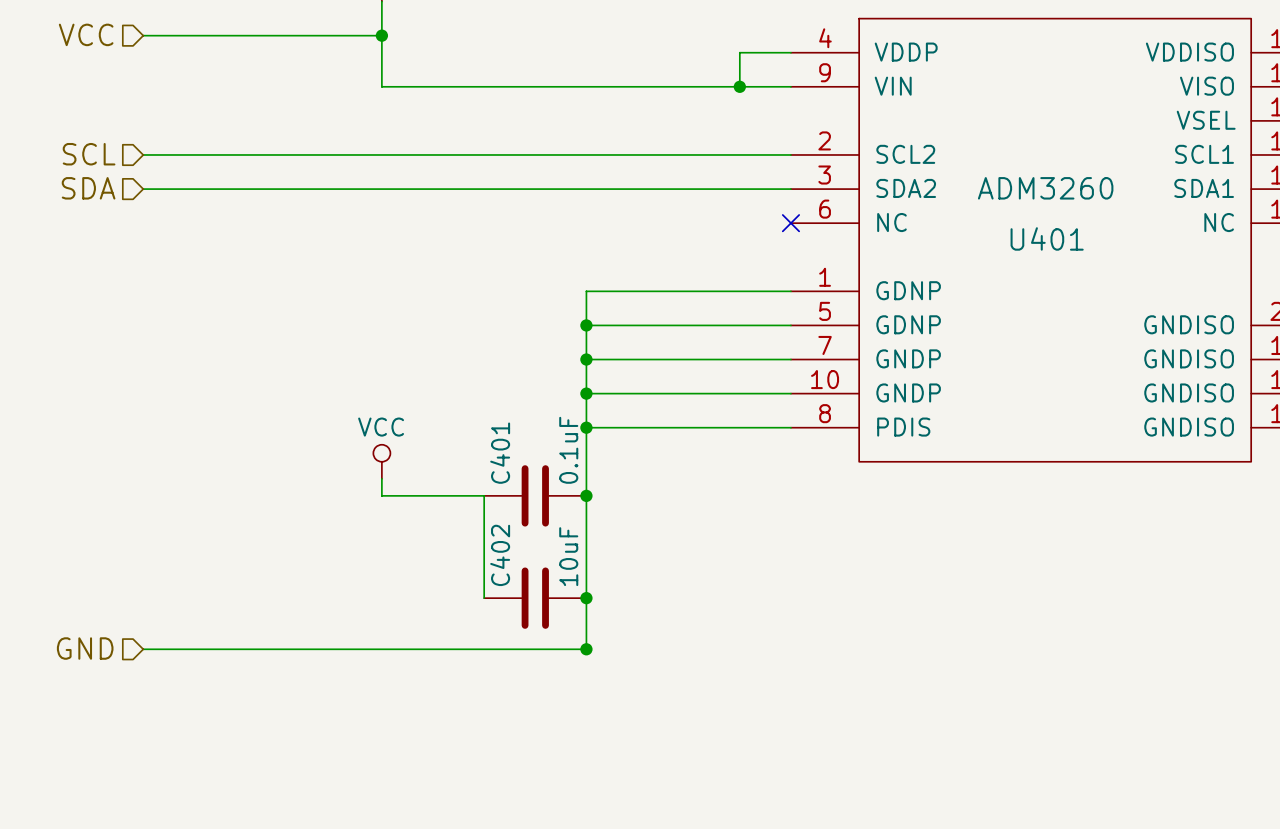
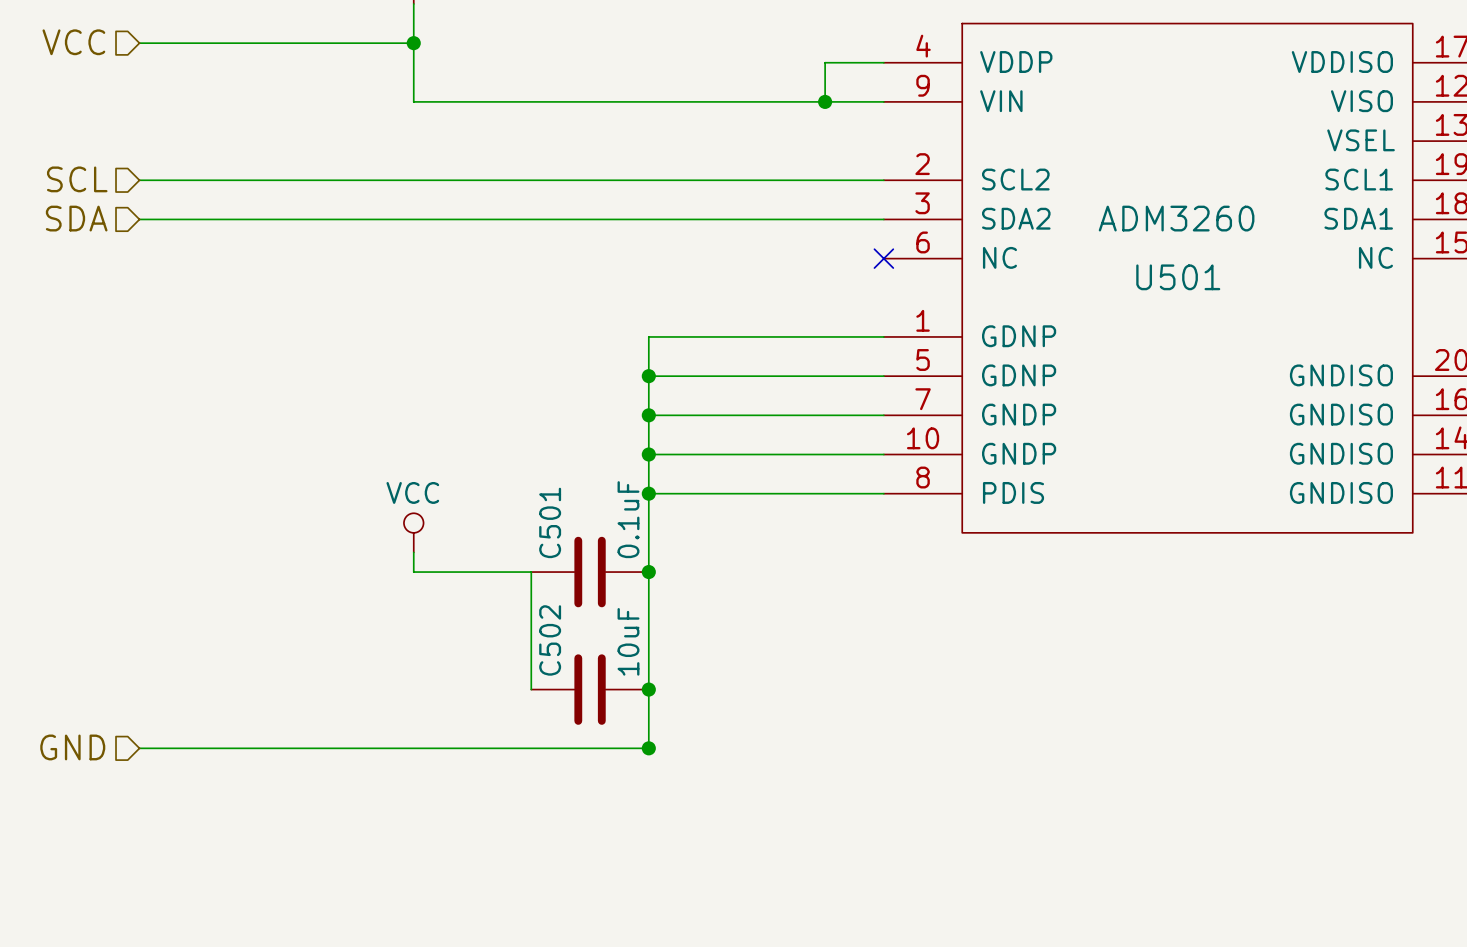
U401 name: U401 (1047, 238) -> U501 (1178, 277)
C401 name: C401 (500, 453) -> C501 (550, 522)
C402 name: C402 (500, 555) -> C502 (550, 640)

